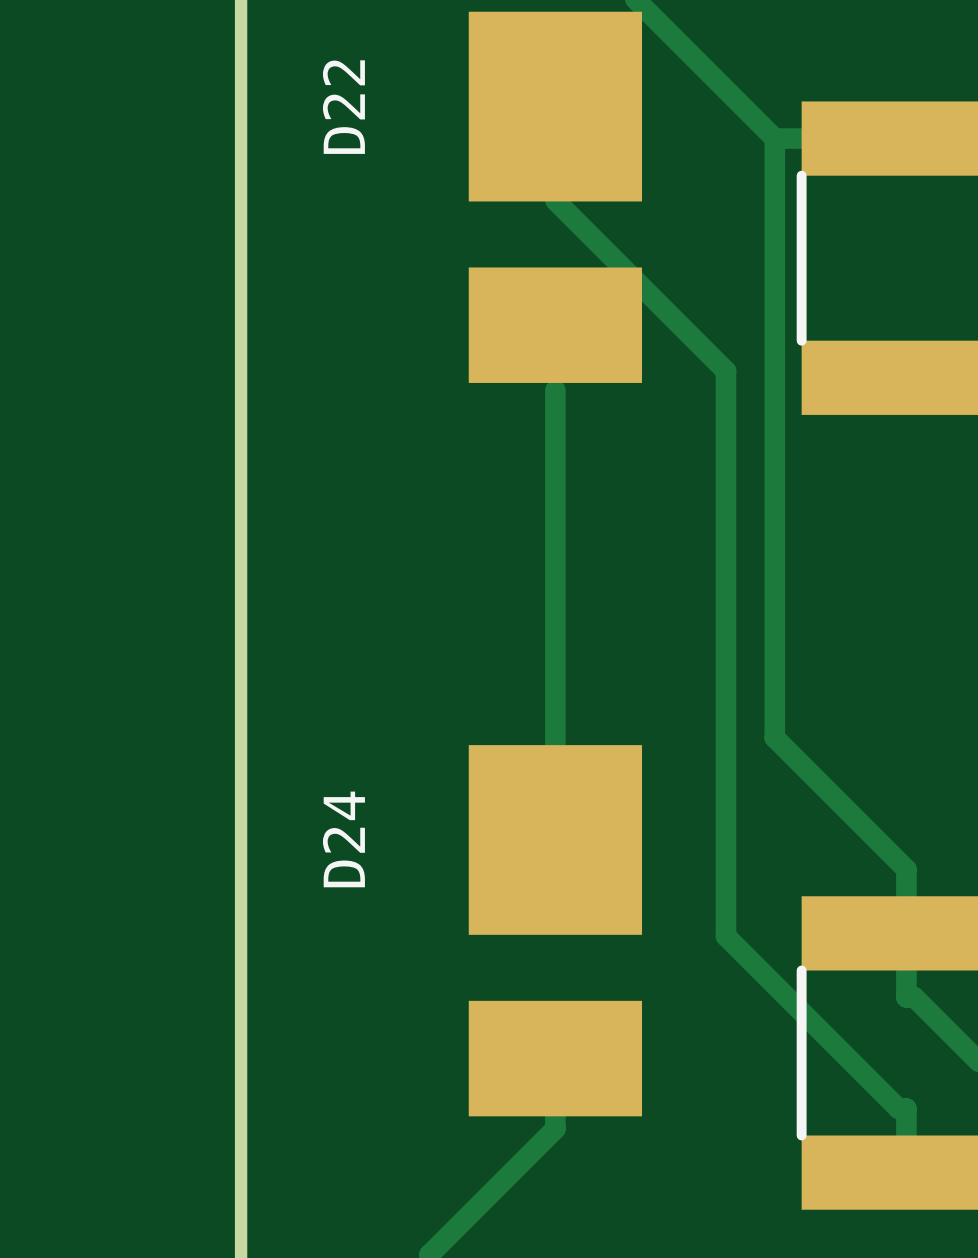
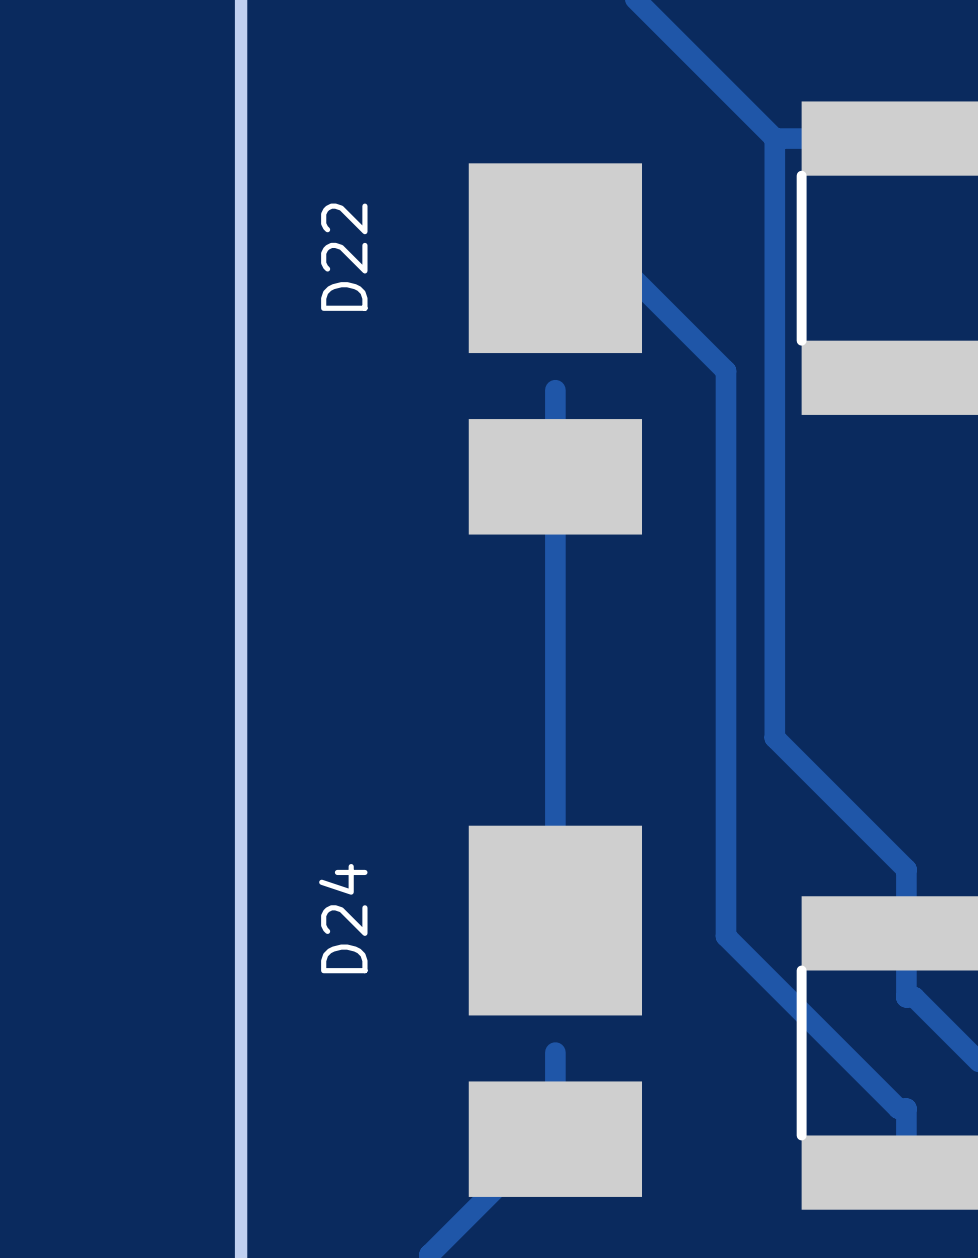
D22 position: (555, 197) -> (555, 348)
D24 position: (555, 930) -> (555, 1011)

